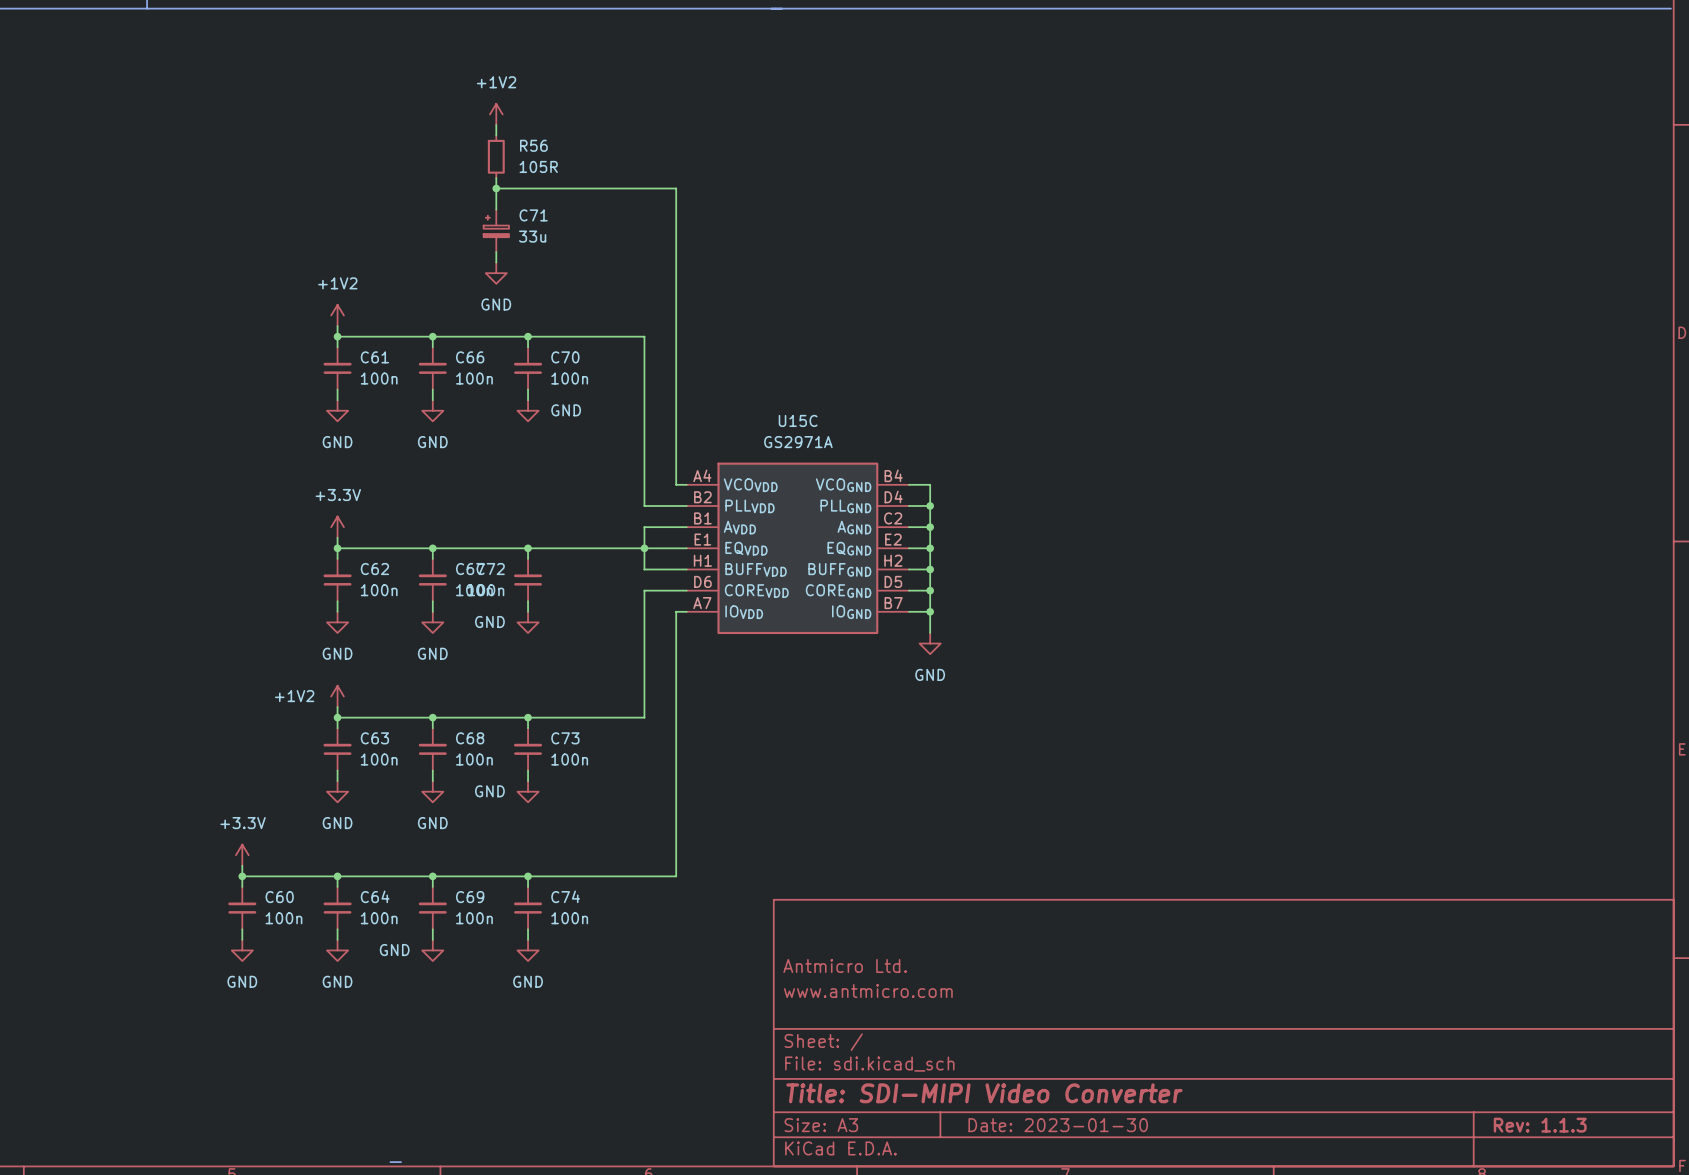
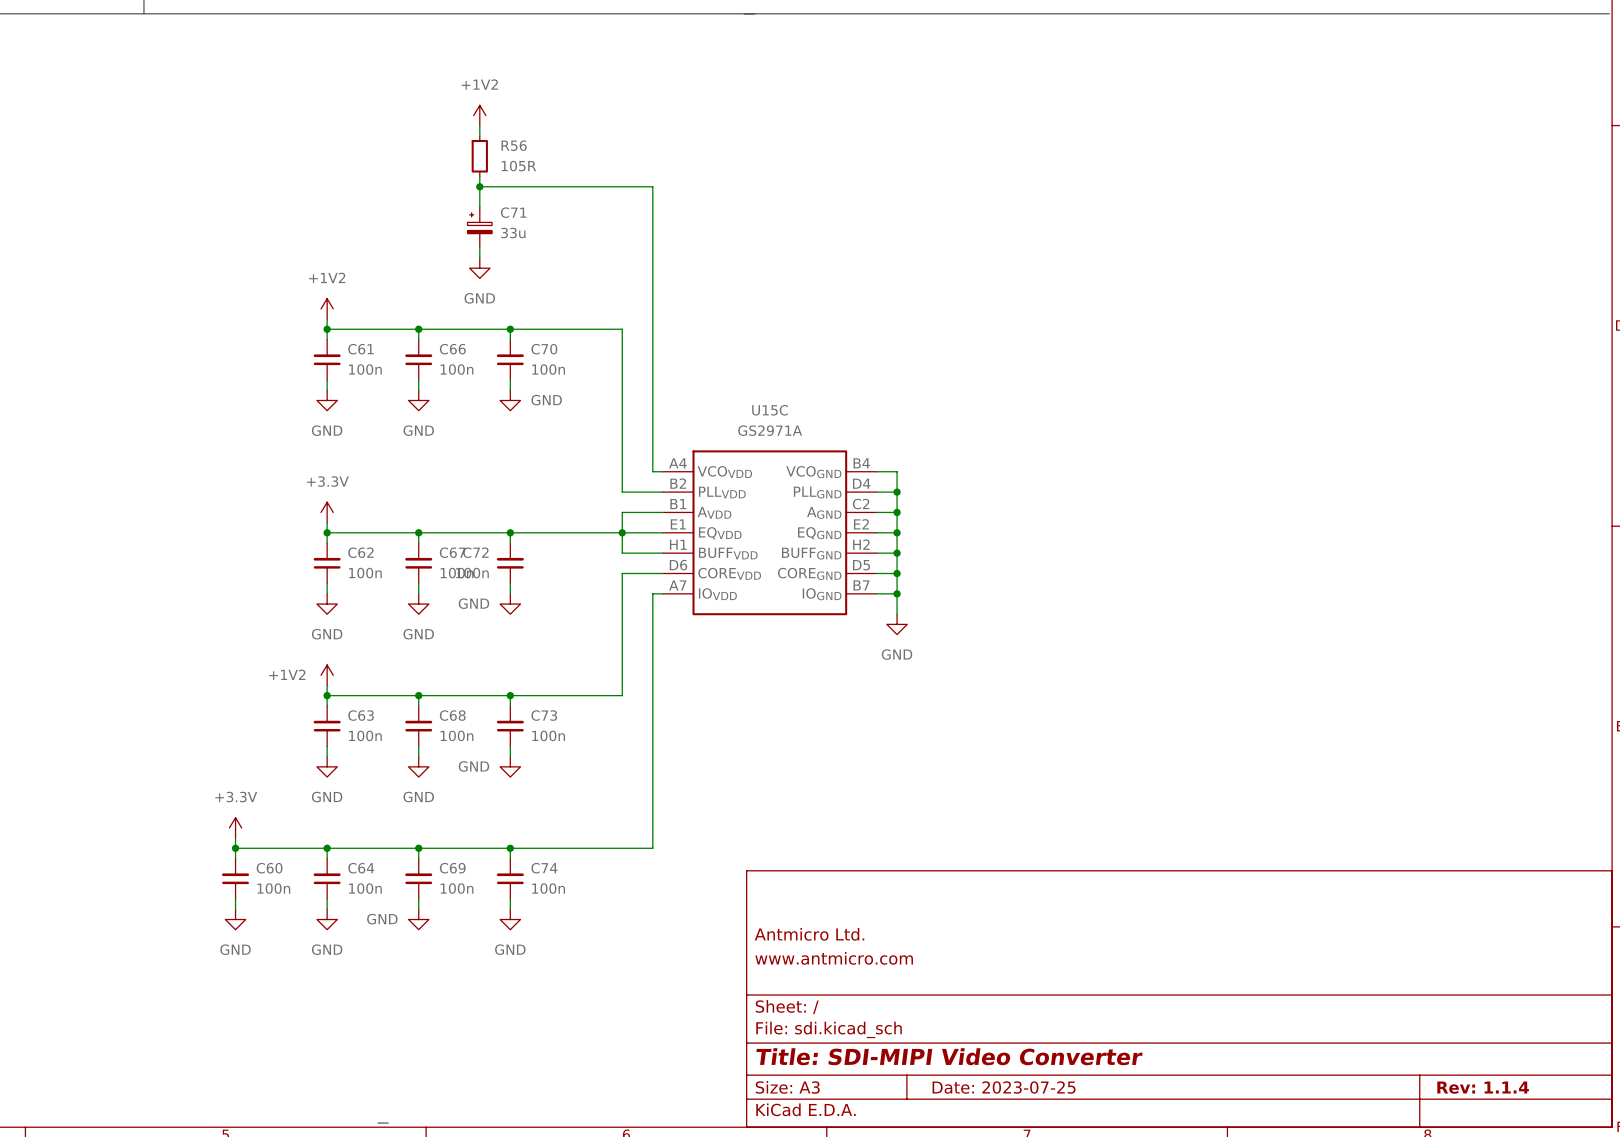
title block: Date: 2023-01-30 (1058, 1125) -> Date: 2023-07-25 (1004, 1087)
title block: Rev: 1.1.3 (1540, 1125) -> Rev: 1.1.4 (1483, 1087)

